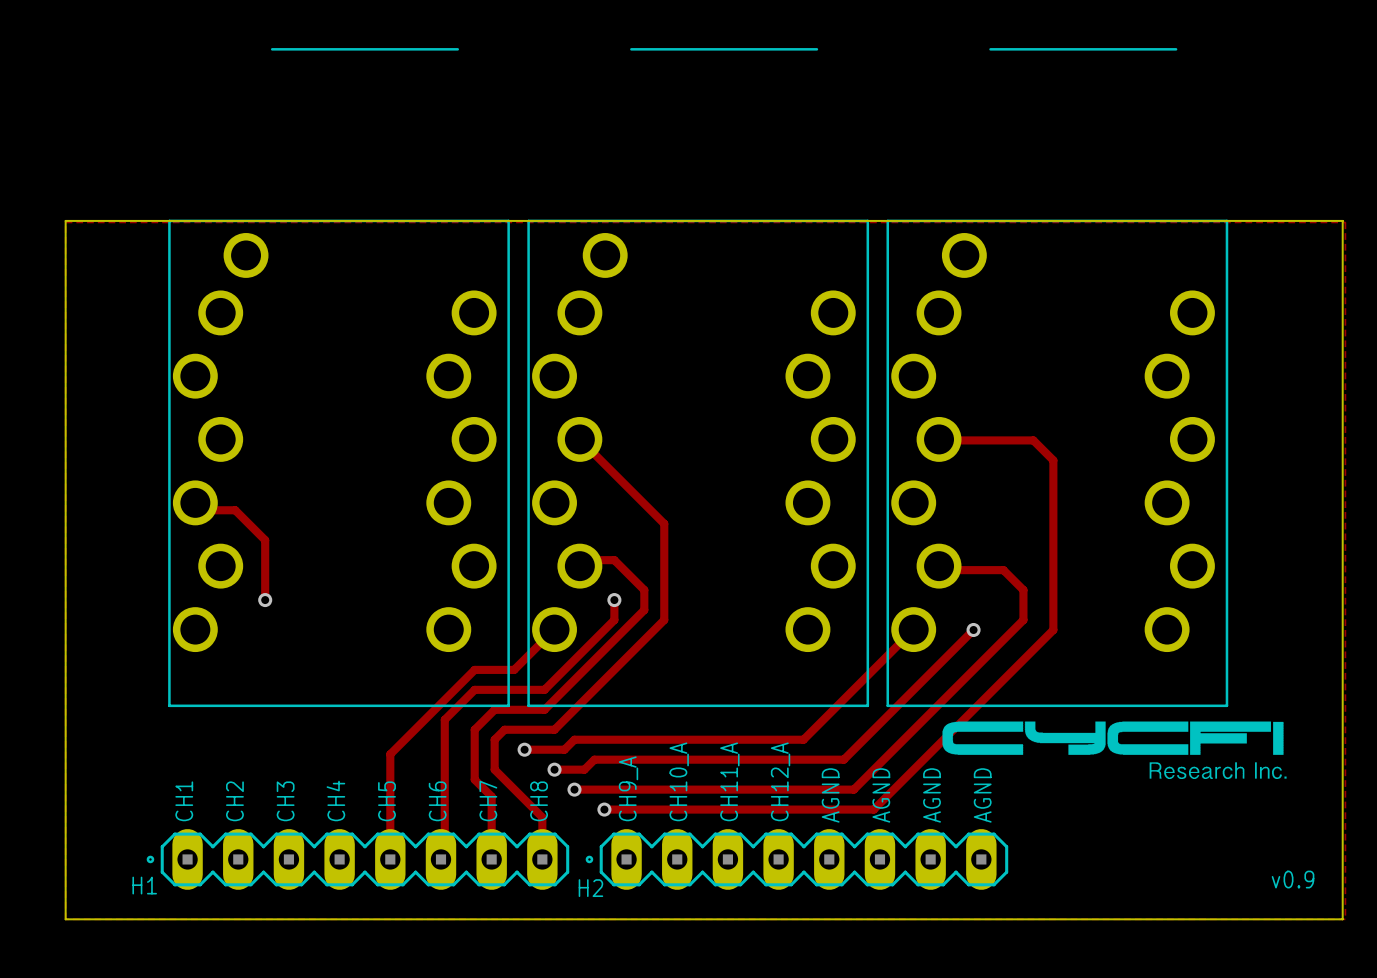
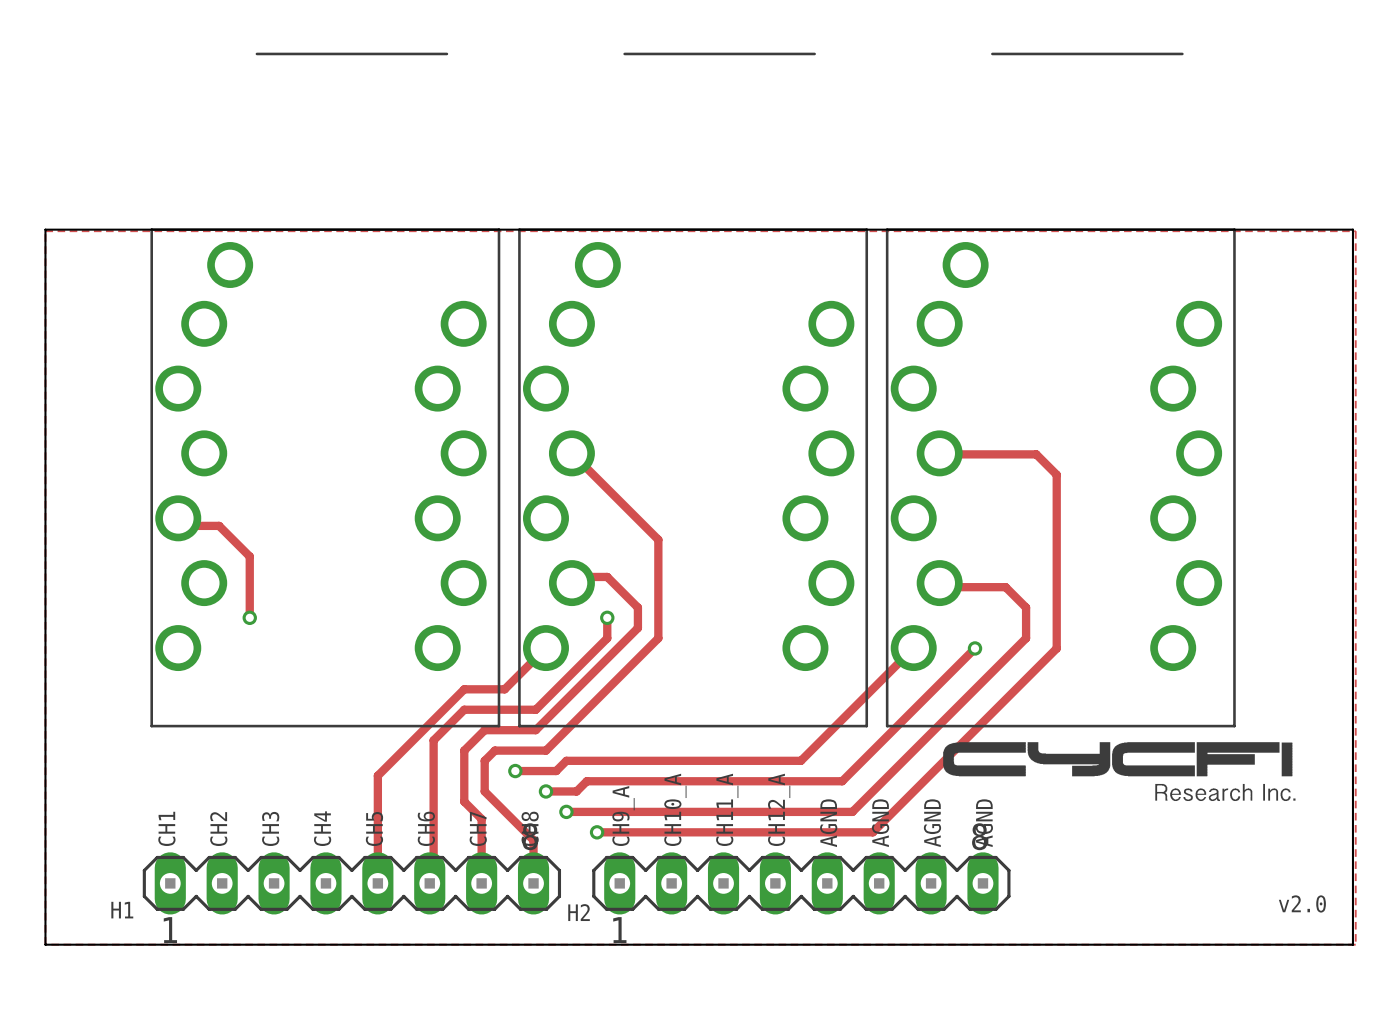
H1 footprint: [146, 829, 570, 890] -> [142, 852, 562, 915]
H2 footprint: [585, 829, 1009, 890] -> [592, 852, 1011, 915]
text: v0.9 (1293, 879) -> v2.0 (1302, 903)

